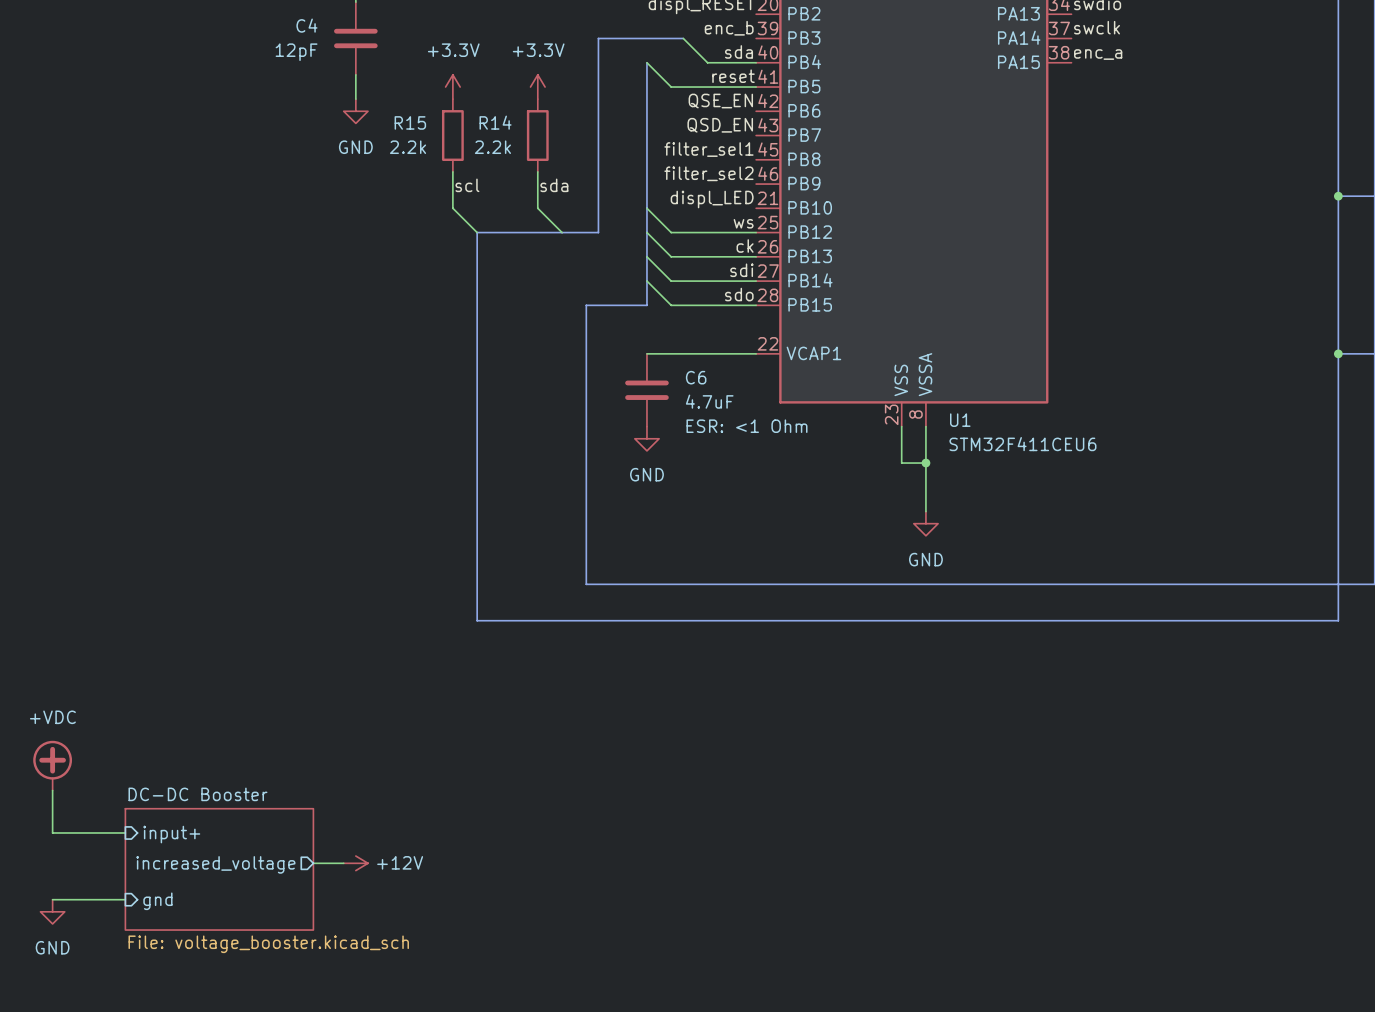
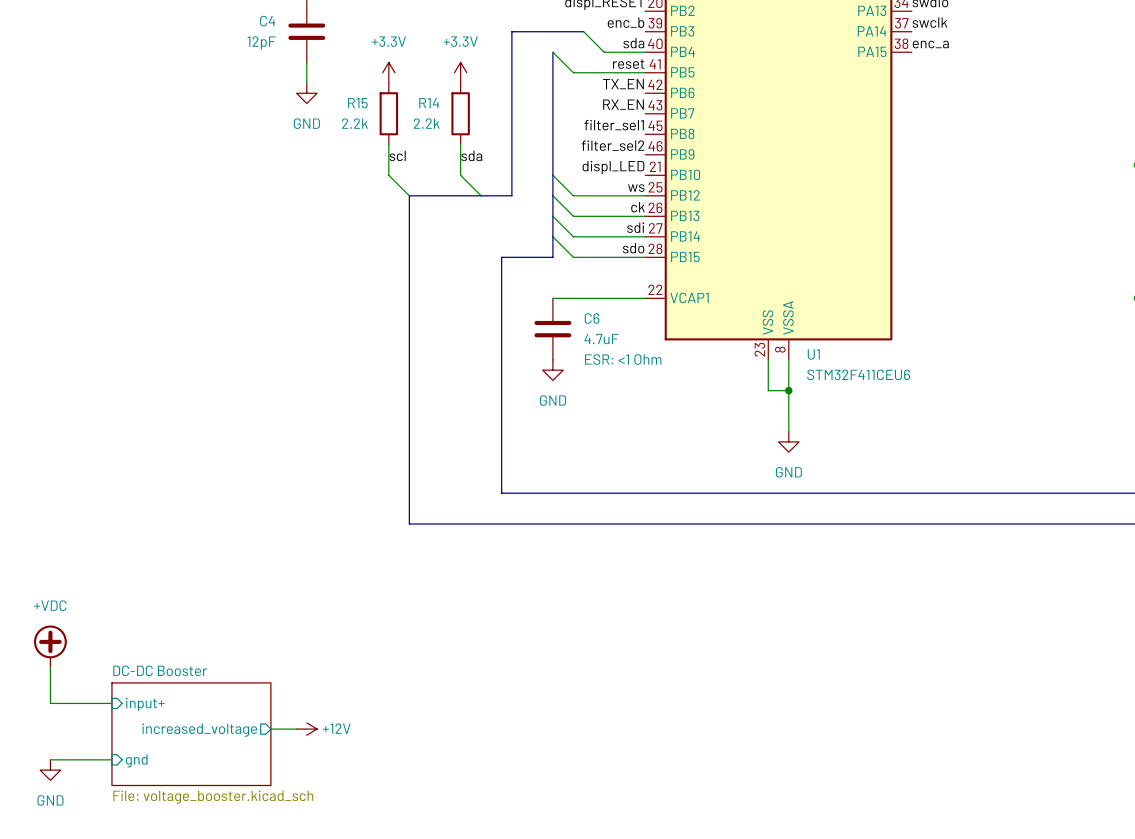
label: QSE_EN (720, 101) -> TX_EN (623, 84)
label: QSD_EN (720, 125) -> RX_EN (623, 104)

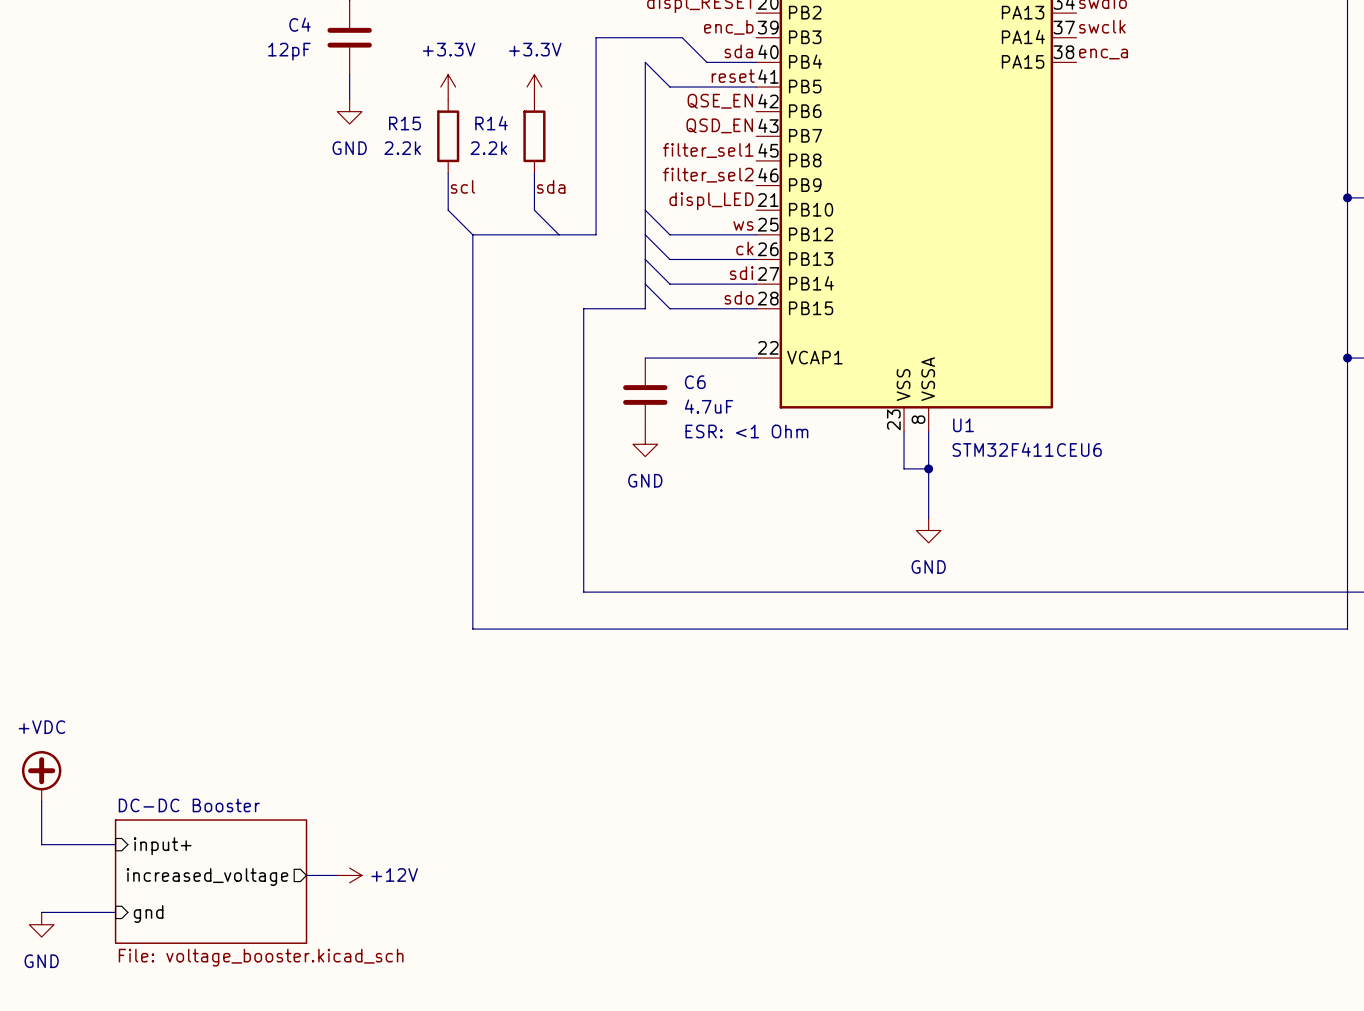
label: TX_EN (623, 84) -> QSE_EN (720, 101)
label: RX_EN (623, 104) -> QSD_EN (719, 125)

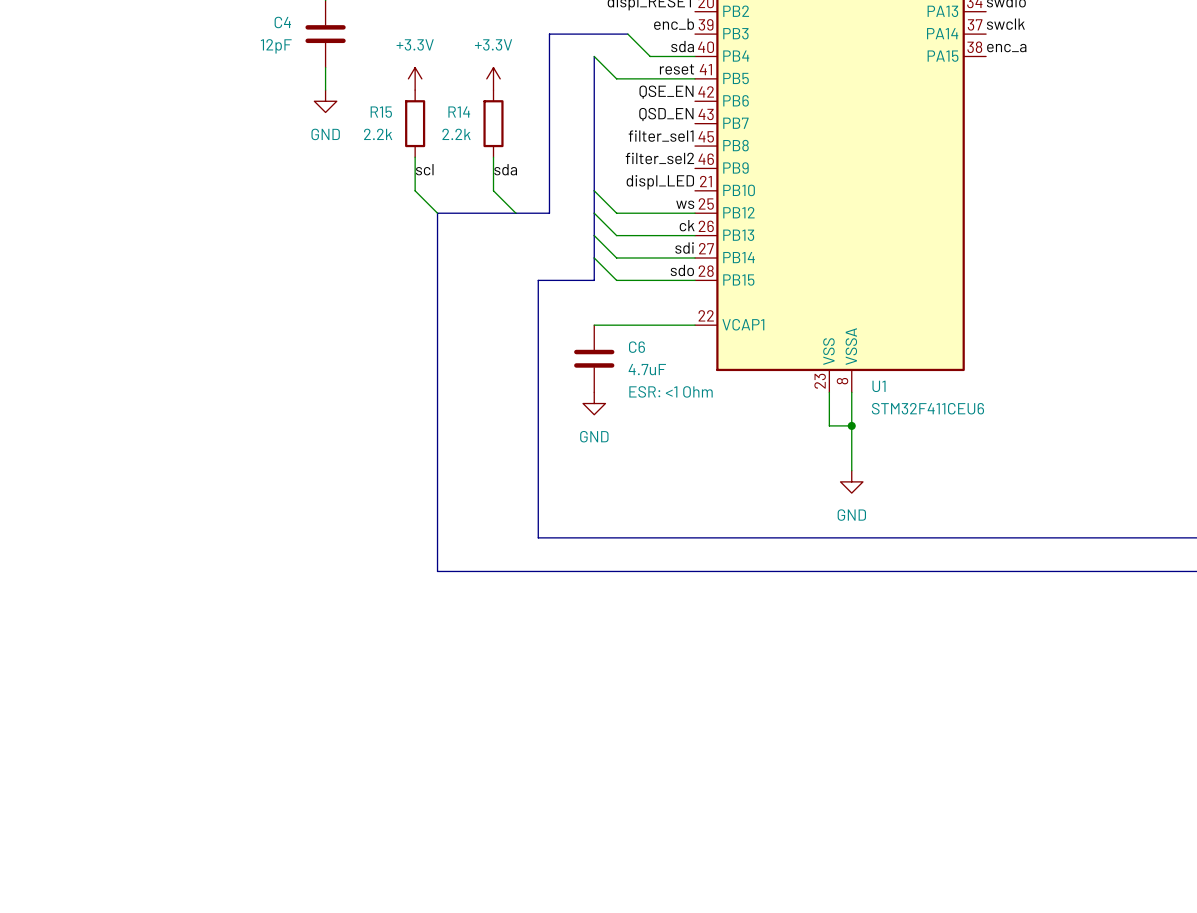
power symbol: +VDC (41, 776) -> none
wire: (41, 801) (41, 844) (115, 844) -> none
sheet pin: input+ (162, 846) -> none
wire: (306, 875) (337, 875) -> none
power symbol: +12V (349, 875) -> none
sheet pin: increased_voltage (207, 877) -> none
sheet DC-DC Booster: File: voltage_booster.kicad_sch (211, 881) -> none
wire: (41, 912) (115, 912) -> none
sheet pin: gnd (148, 914) -> none
power symbol: GND (41, 924) -> none

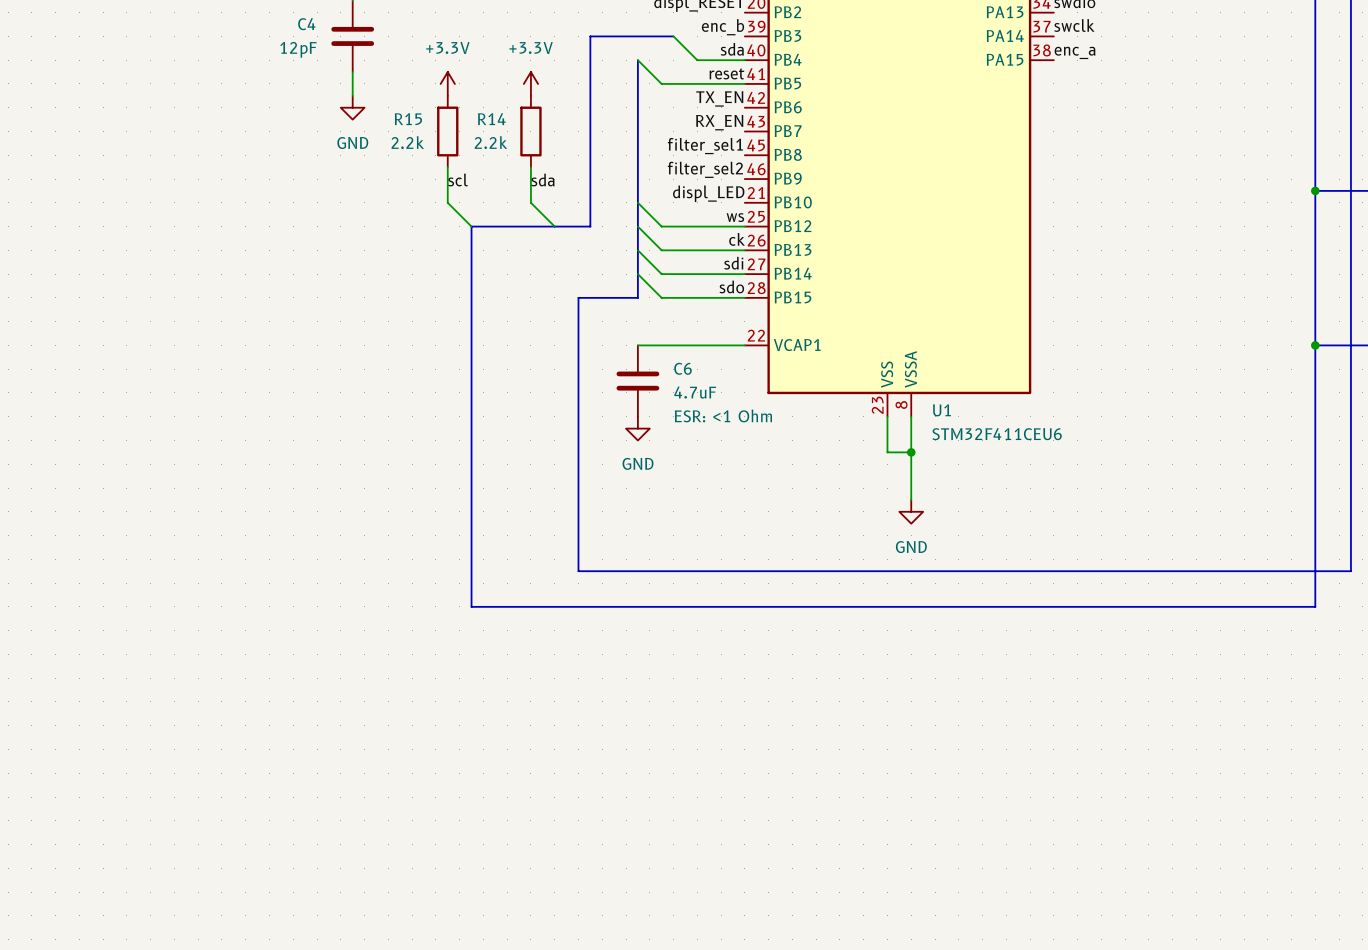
label: QSE_EN (666, 92) -> TX_EN (719, 98)
label: QSD_EN (666, 114) -> RX_EN (719, 122)

